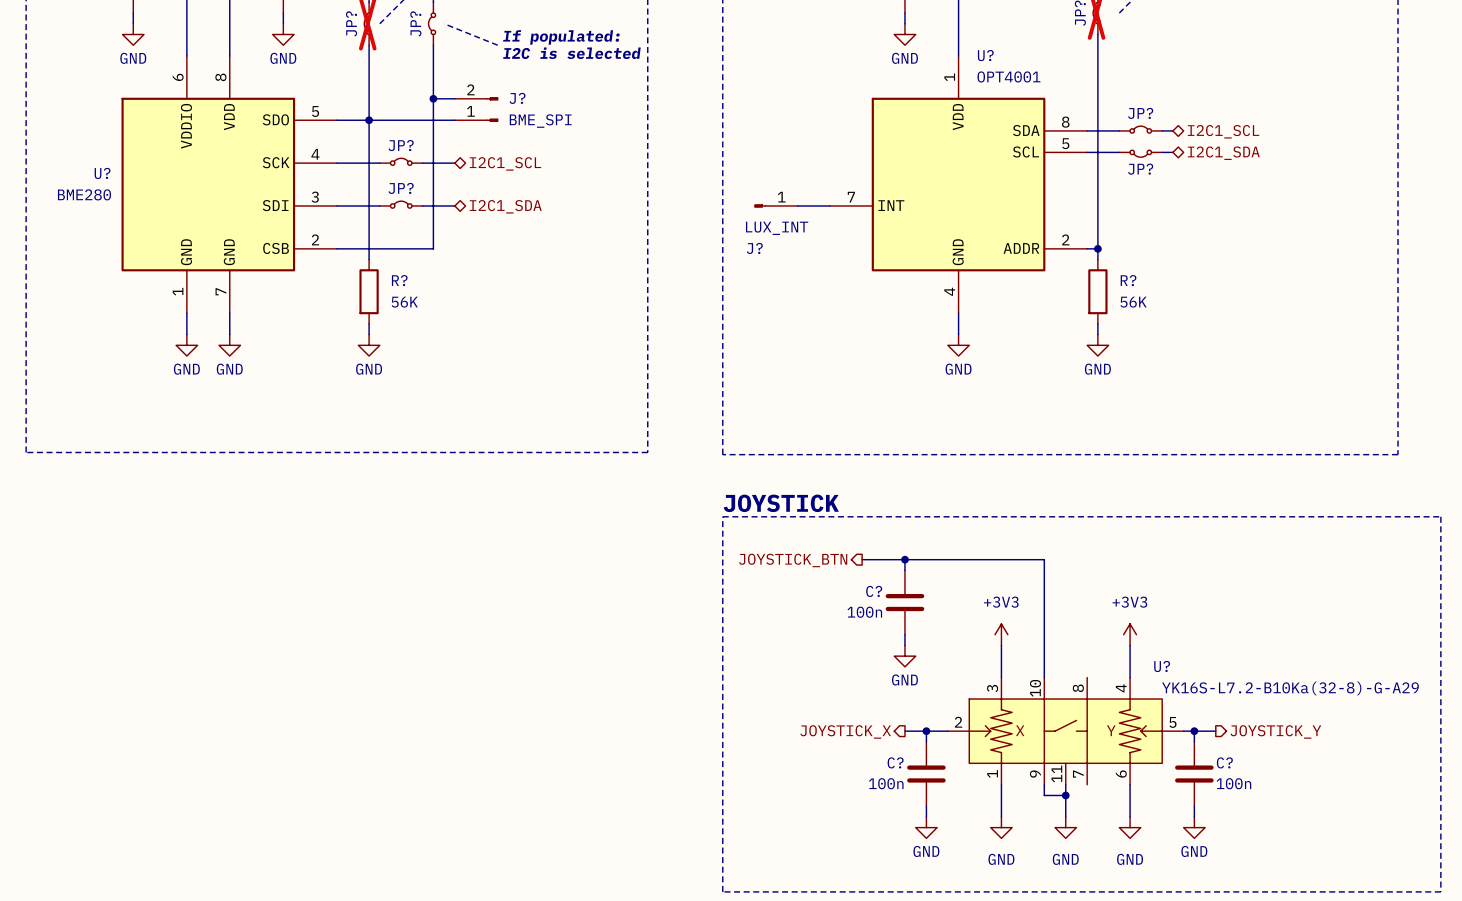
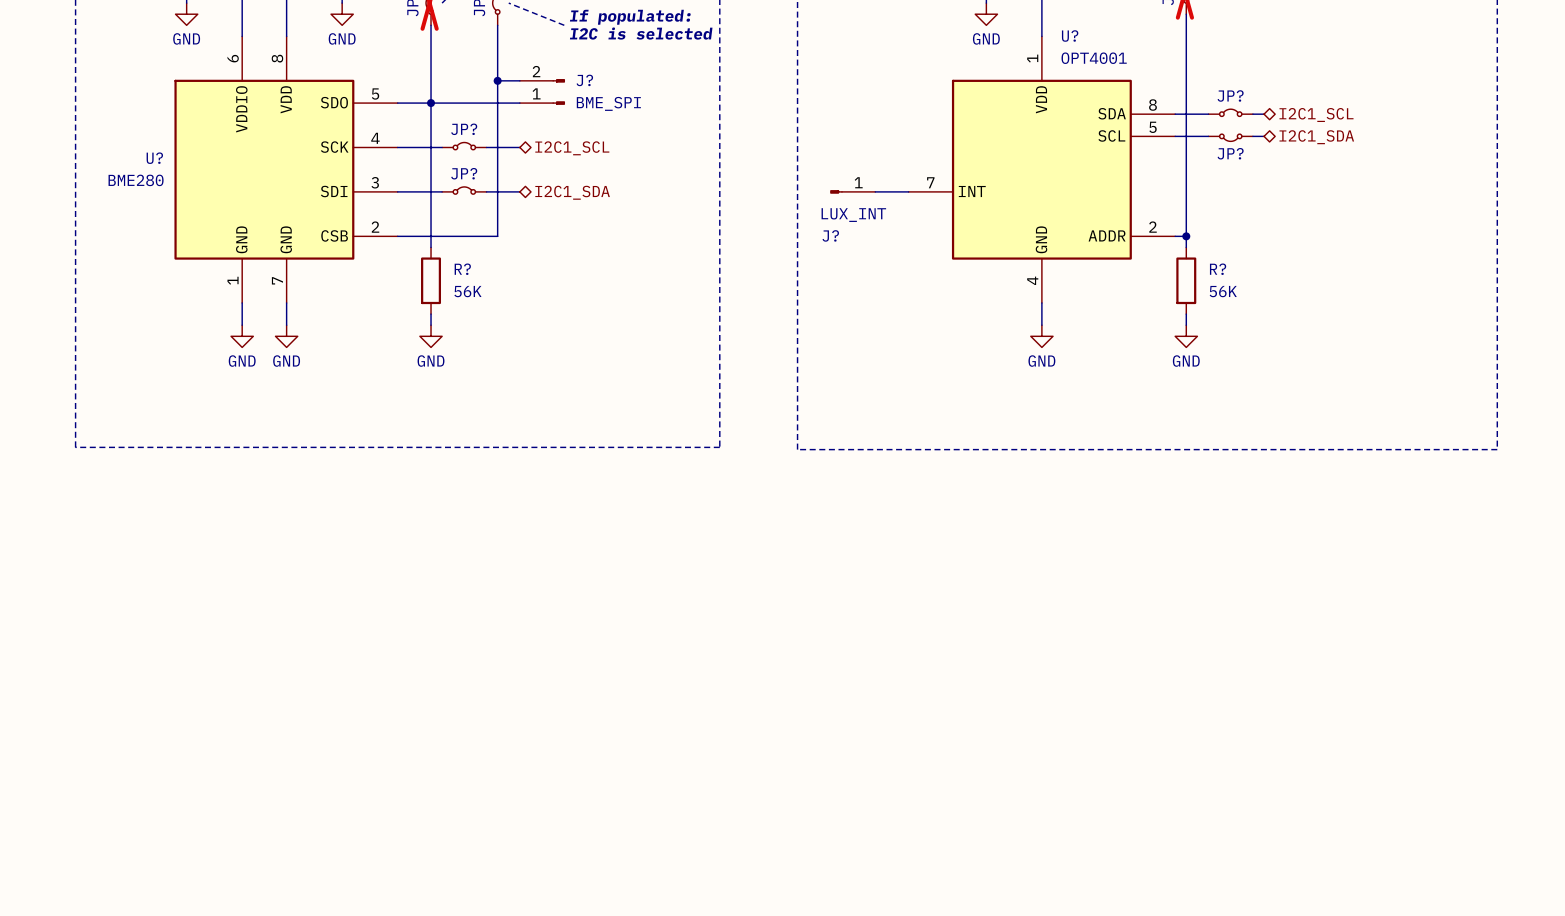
text: JOYSTICK (781, 503) -> none
line: (722, 516) (1440, 516) (1440, 891) (722, 891) (722, 516) -> none
wire: (862, 559) (1044, 559) (1044, 677) -> none
wire: (904, 559) (904, 570) -> none
junction: (904, 559) -> none
hierarchical label: JOYSTICK_BTN (793, 560) -> none
C?: 100n (904, 602) -> none
wire: (904, 634) (904, 645) -> none
power symbol: +3V3 (1001, 634) -> none
power symbol: +3V3 (1130, 634) -> none
wire: (1001, 645) (1001, 677) -> none
wire: (1130, 645) (1130, 677) -> none
power symbol: GND (904, 656) -> none
hierarchical label: JOYSTICK_X (845, 731) -> none
wire: (904, 731) (947, 731) -> none
wire: (926, 731) (926, 741) -> none
junction: (926, 731) -> none
U?: YK16S-L7.2-B10Ka(32-8)-G-A29 (1065, 731) -> none
wire: (1183, 731) (1215, 731) -> none
wire: (1194, 731) (1194, 741) -> none
junction: (1194, 731) -> none
hierarchical label: JOYSTICK_Y (1275, 731) -> none
C?: 100n (926, 774) -> none
C?: 100n (1194, 774) -> none
wire: (1001, 784) (1001, 816) -> none
wire: (1044, 784) (1044, 795) (1065, 795) -> none
wire: (1065, 784) (1065, 816) -> none
wire: (1130, 784) (1130, 816) -> none
junction: (1065, 795) -> none
wire: (926, 806) (926, 816) -> none
wire: (1194, 806) (1194, 816) -> none
power symbol: GND (926, 827) -> none
power symbol: GND (1001, 827) -> none
power symbol: GND (1065, 827) -> none
power symbol: GND (1130, 827) -> none
power symbol: GND (1194, 827) -> none

